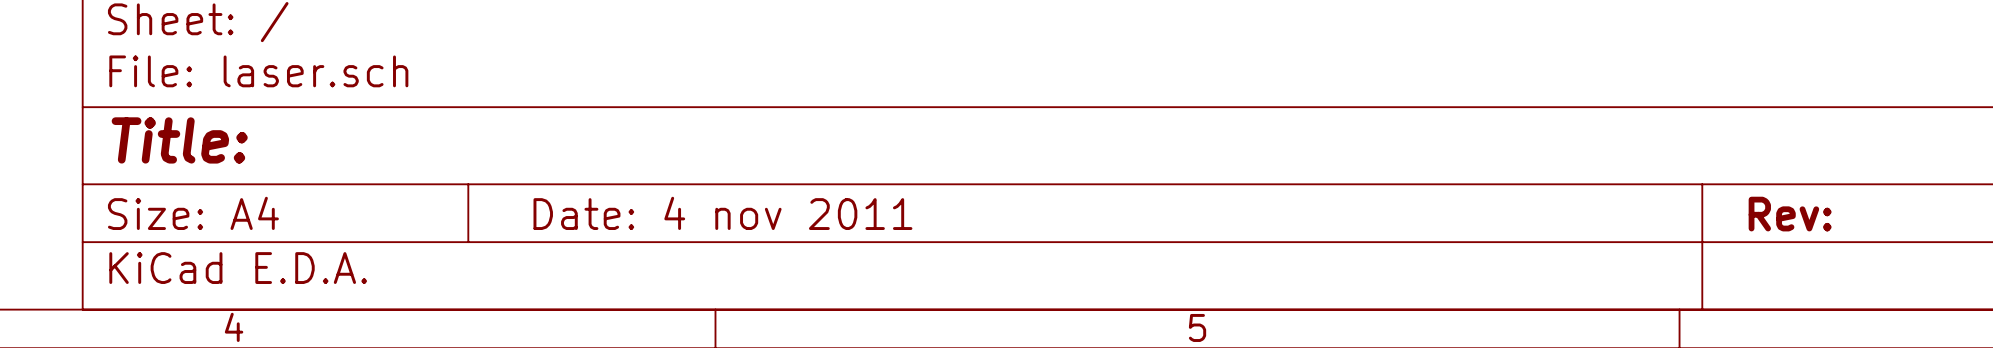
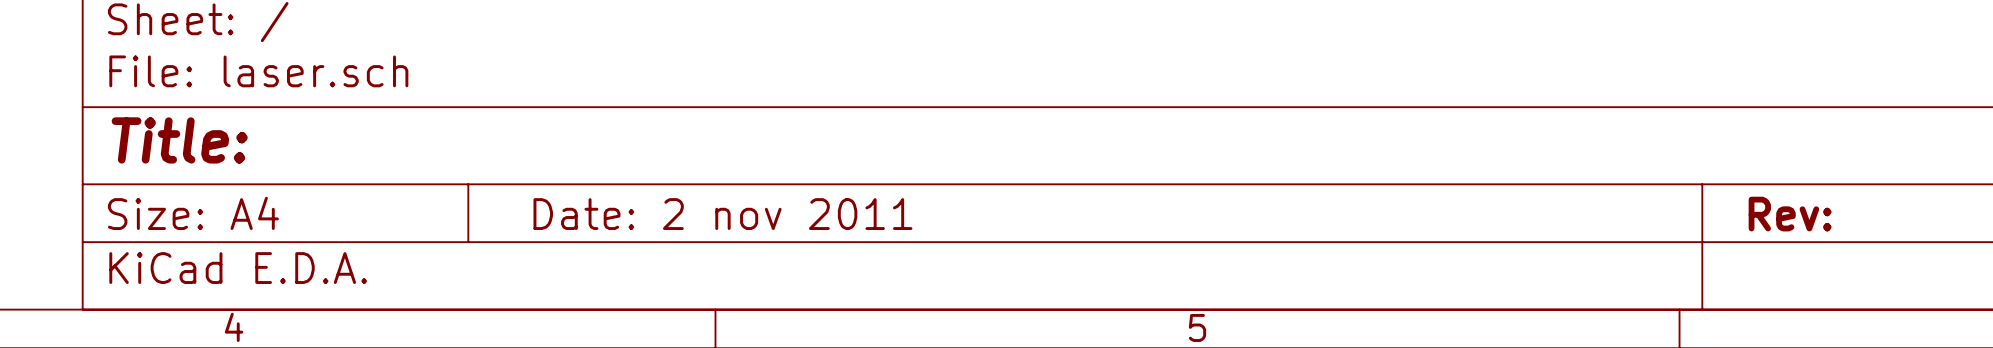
title block: Date: 4 nov 2011 (722, 213) -> Date: 2 nov 2011 (722, 214)

